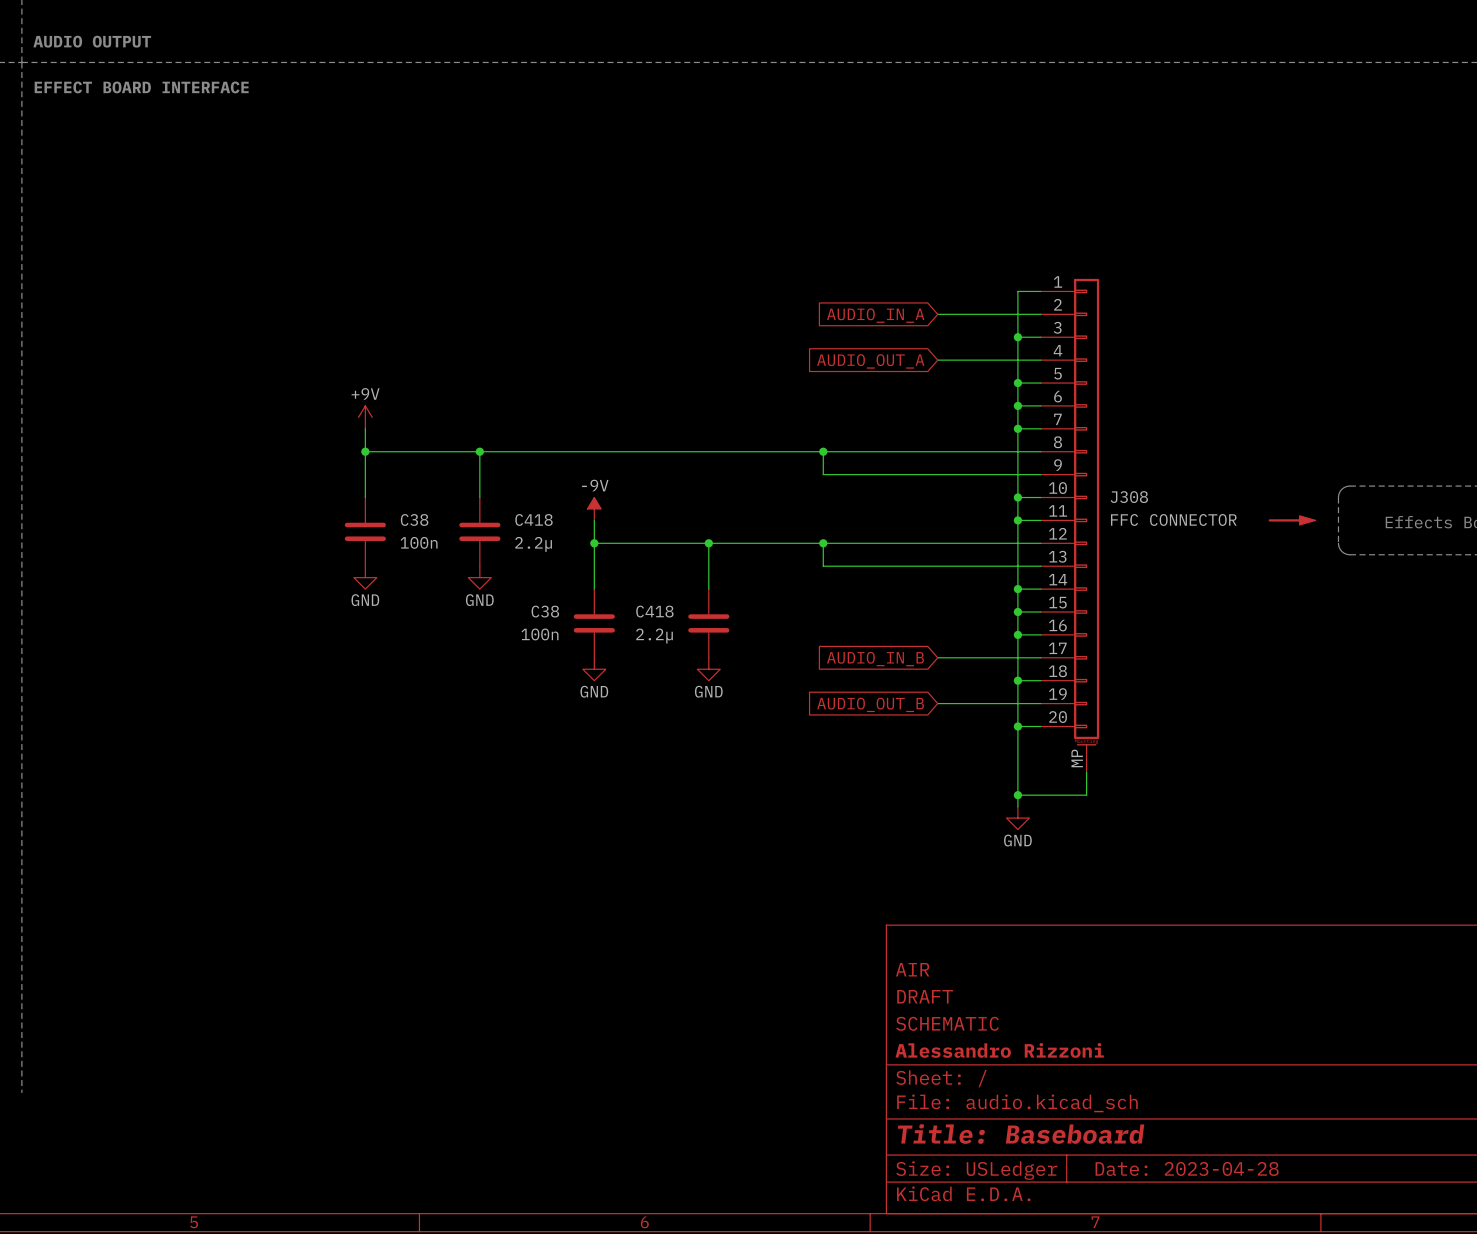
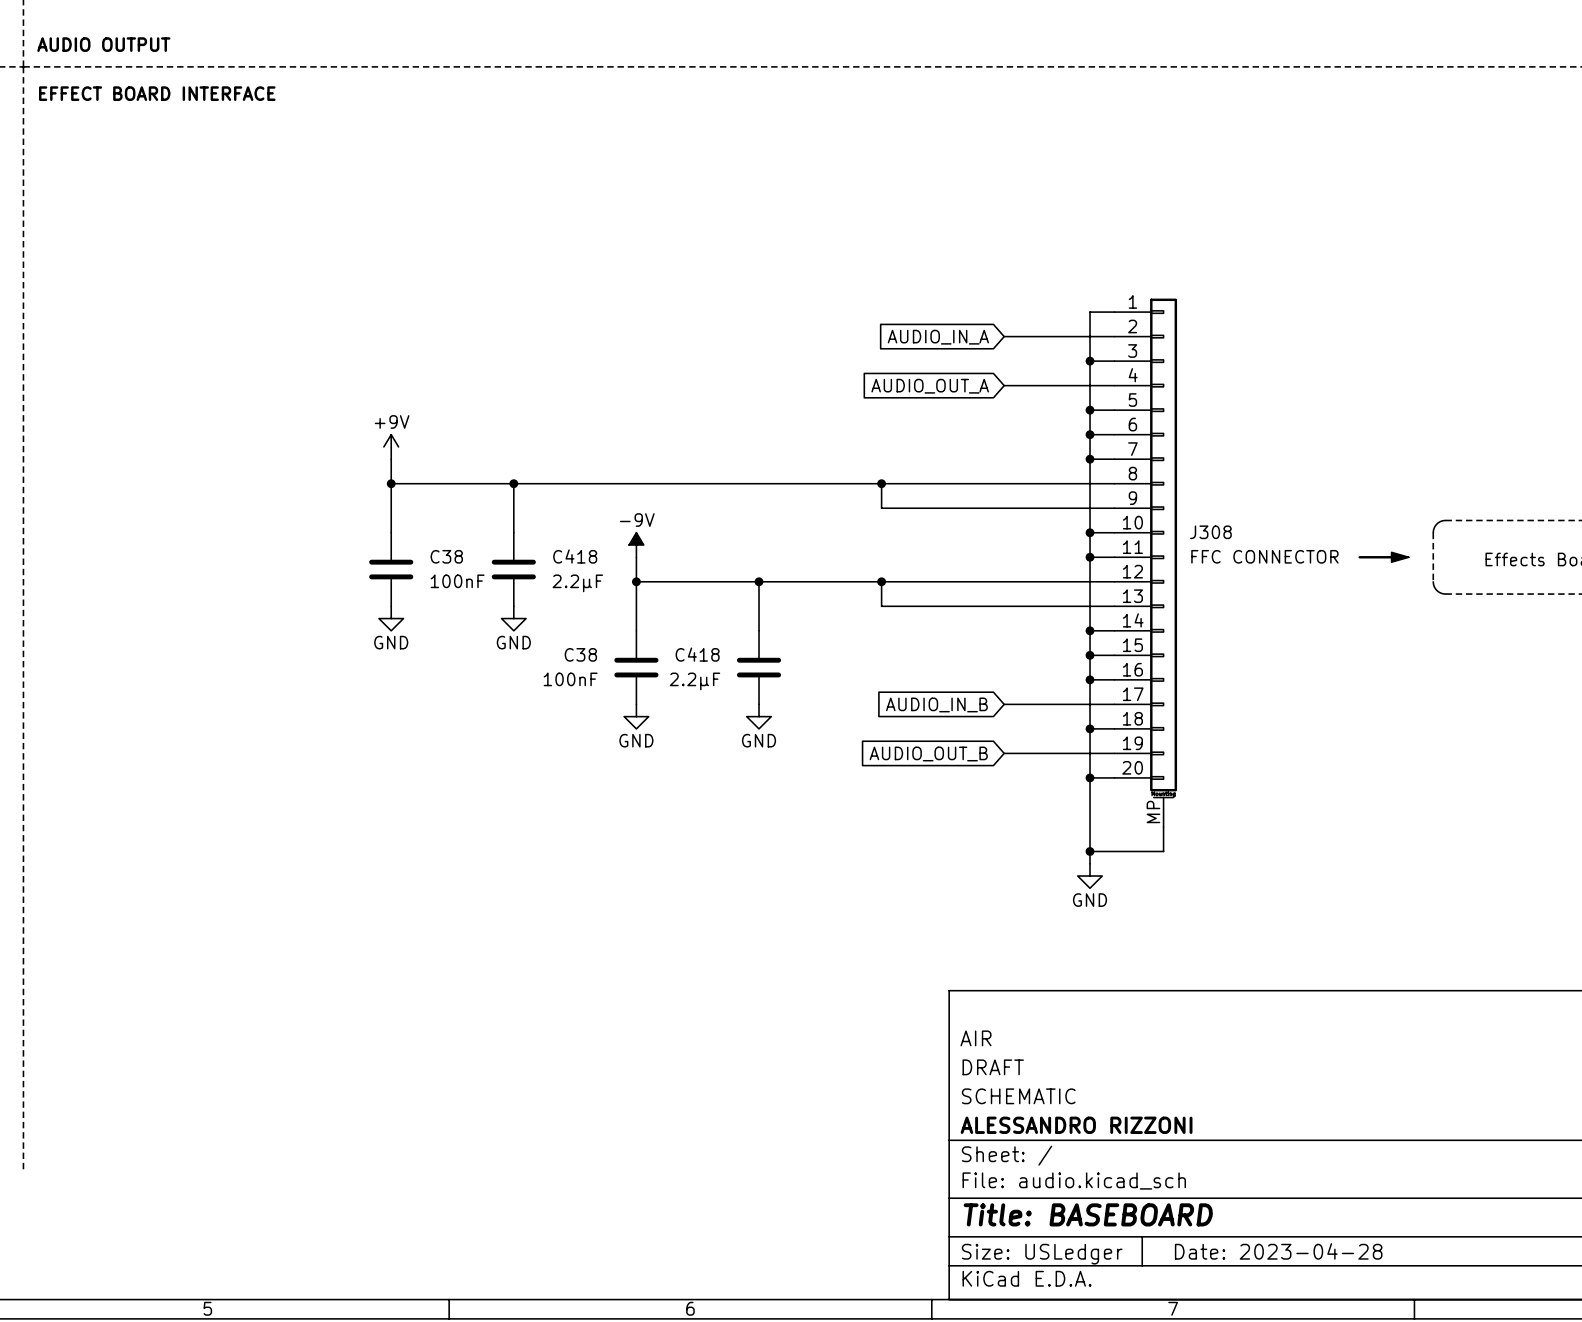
C38 value: 100n (419, 542) -> 100nF (457, 581)
C418 value: 2.2µ (533, 544) -> 2.2µF (577, 583)
C38 value: 100n (539, 634) -> 100nF (570, 679)
C418 value: 2.2µ (654, 636) -> 2.2µF (694, 681)
title block: Alessandro Rizzoni (999, 1050) -> ALESSANDRO RIZZONI (1076, 1125)
title block: Title: Baseboard (1021, 1134) -> Title: BASEBOARD (1088, 1214)

